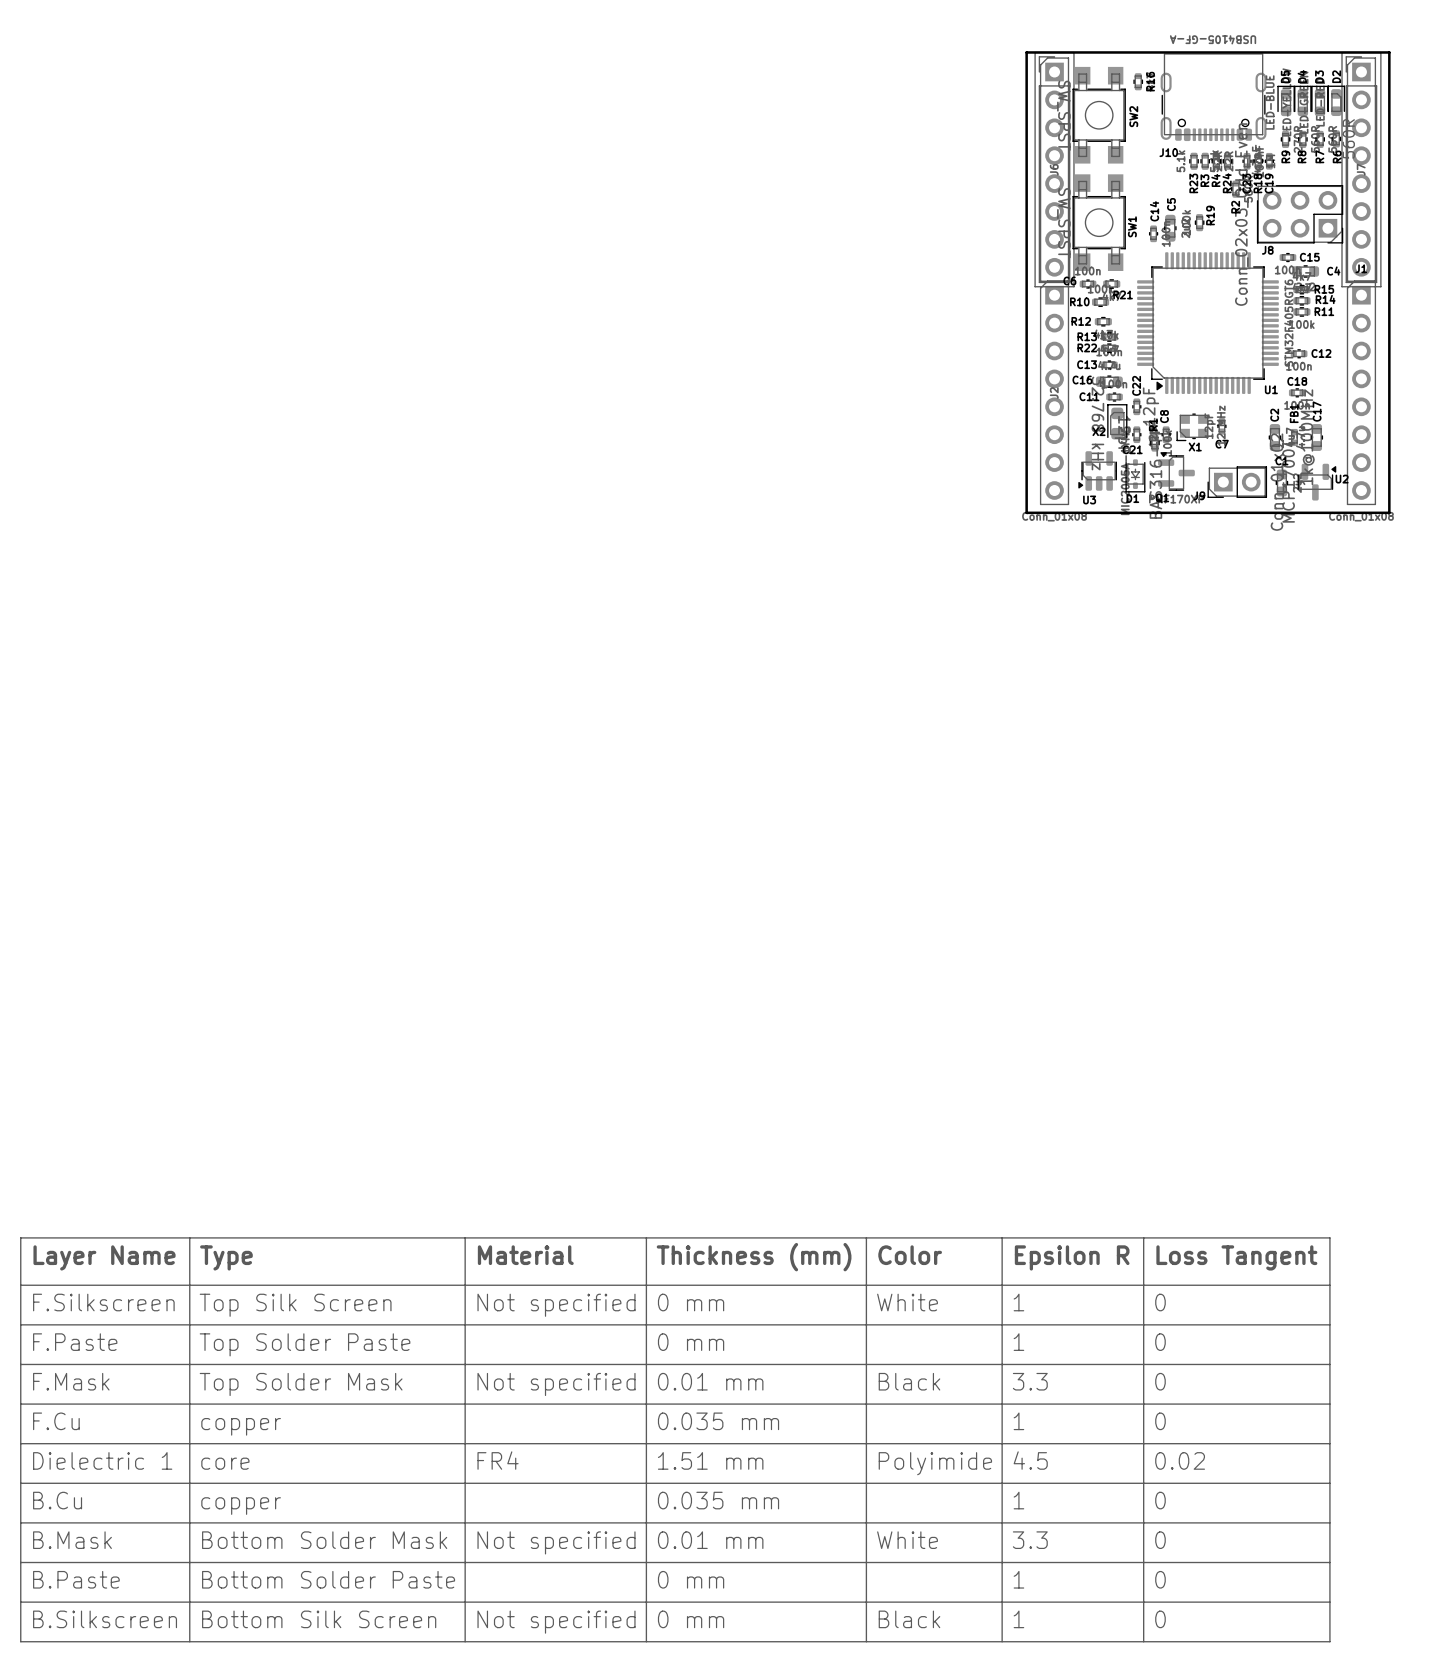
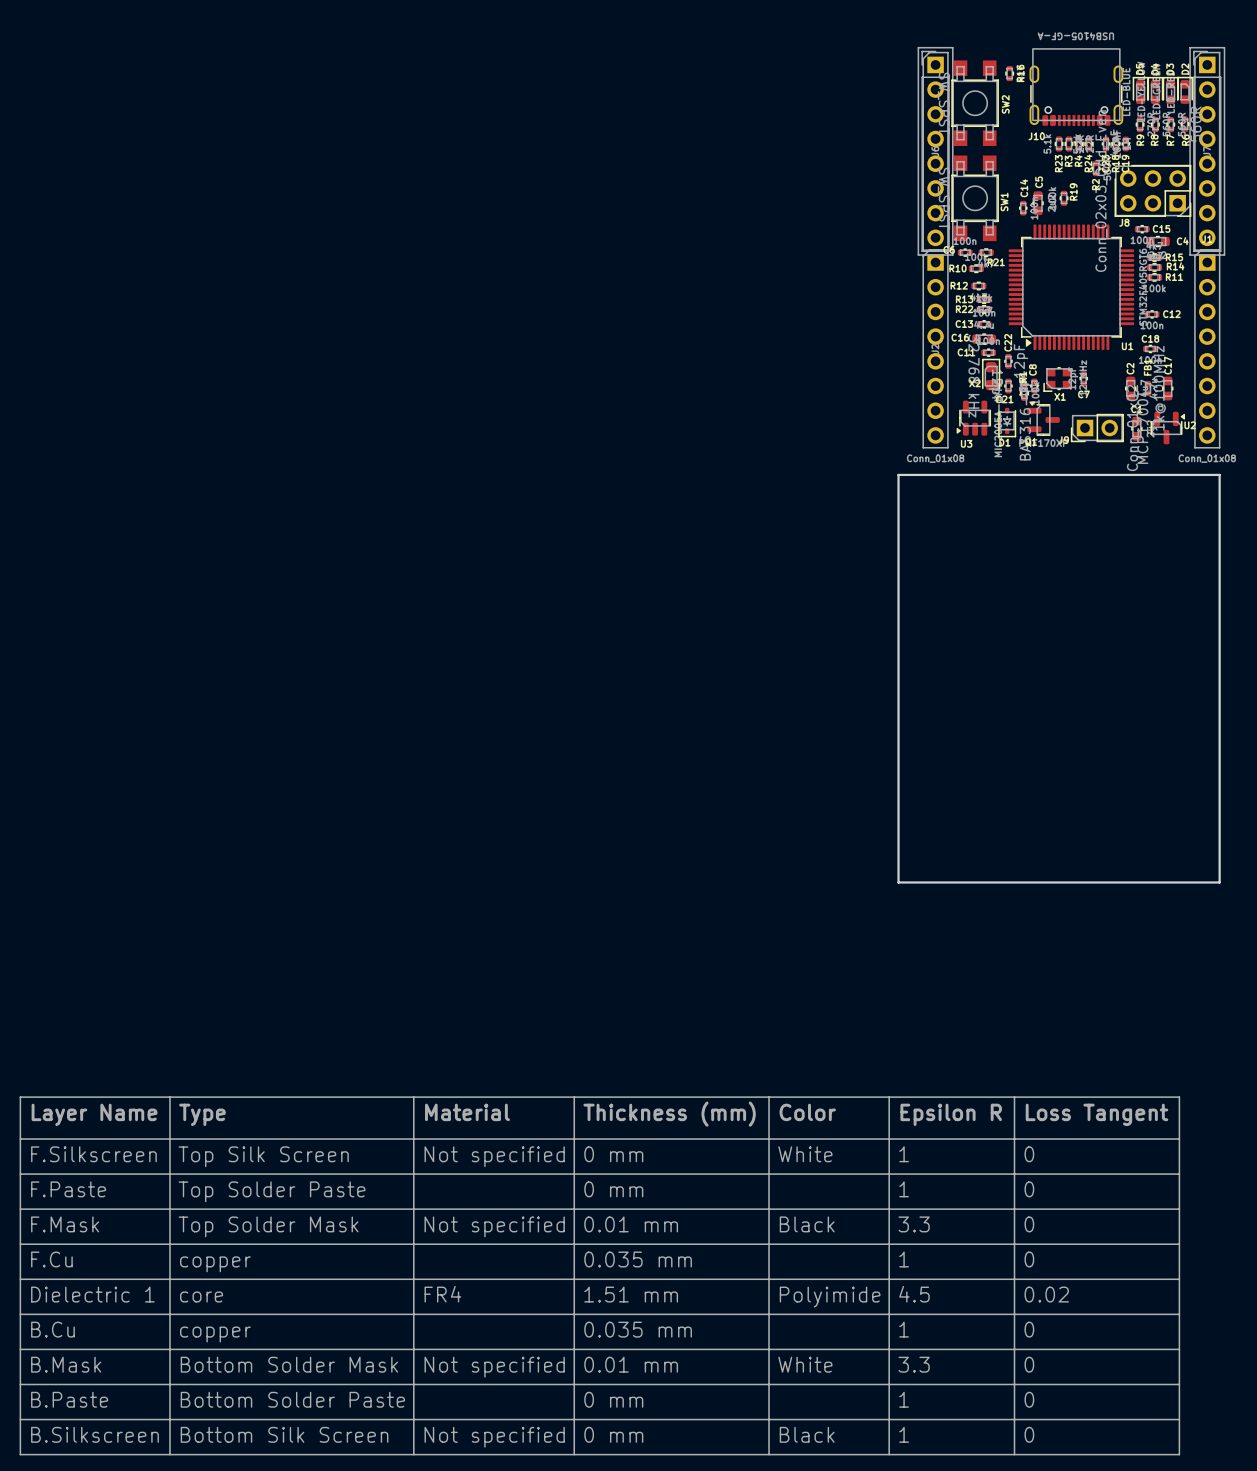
board edge: (1026, 52) (1389, 52) (1389, 512) (1026, 512) (1026, 52) -> none
board edge: none -> (898, 474) (1219, 474) (1219, 882) (898, 882) (898, 474)

